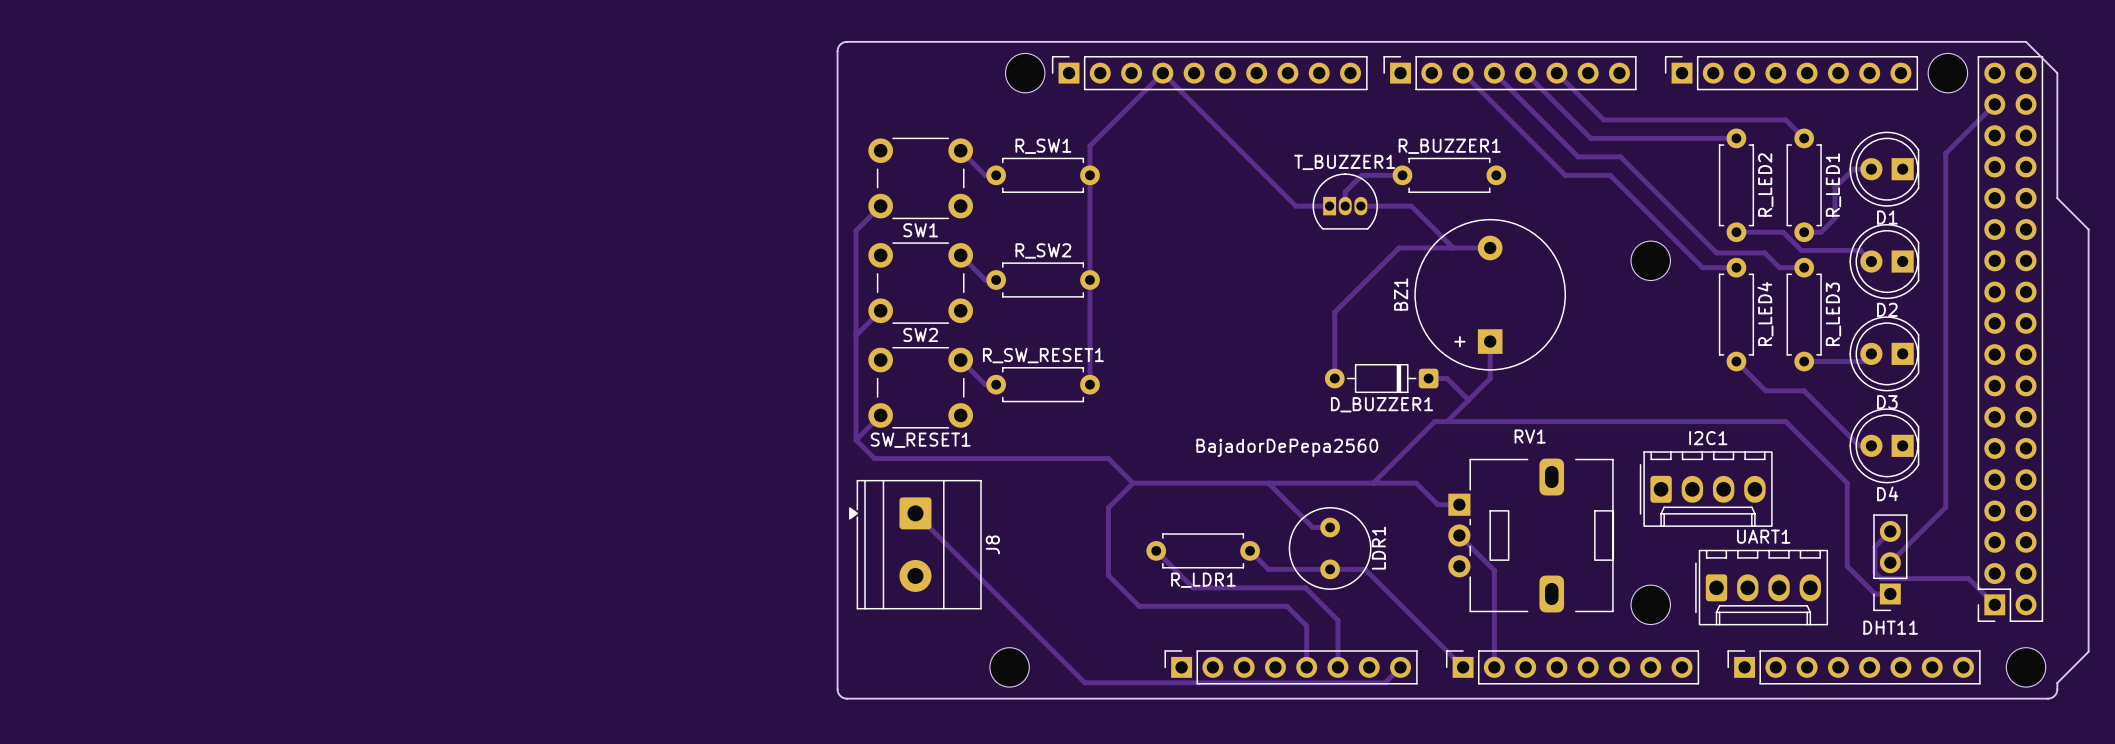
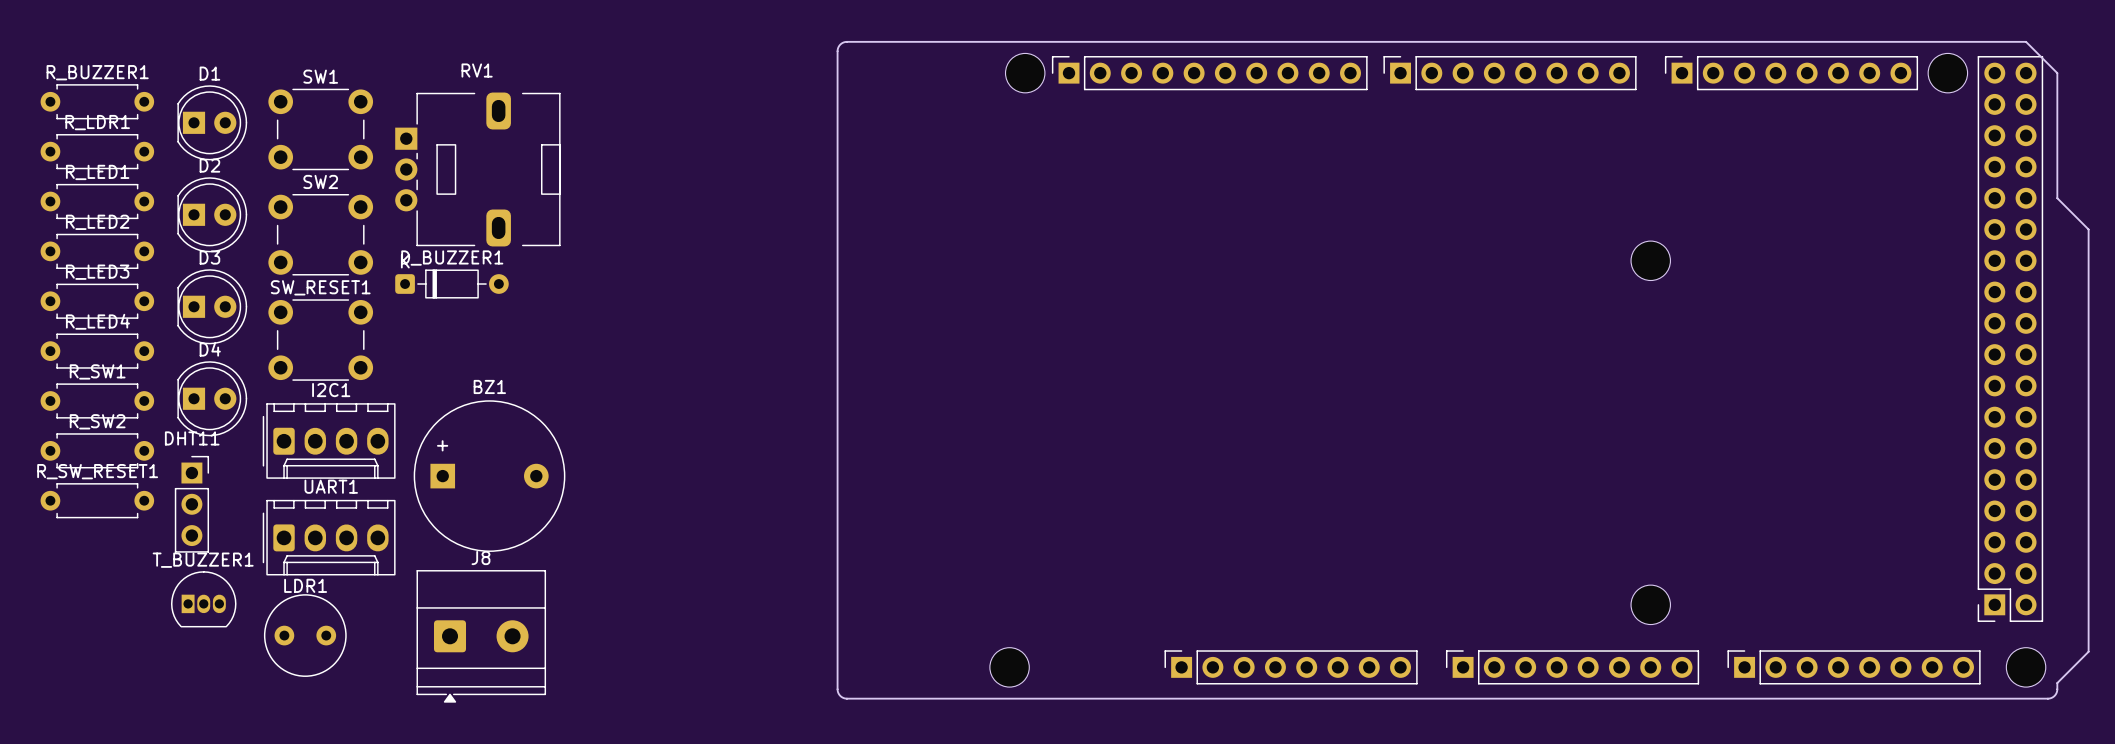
track: (1463, 73) (1565, 175) (1610, 175) (1702, 267) (1736, 267) -> none
track: (1494, 73) (1578, 156) (1620, 156) (1716, 252) (1764, 252) (1779, 267) (1804, 267) -> none
track: (1525, 73) (1590, 138) (1736, 138) -> none
track: (1556, 73) (1603, 119) (1785, 119) (1804, 138) -> none
track: (1994, 104) (1945, 153) (1945, 507) (1890, 562) -> none
track: (960, 150) (985, 175) (996, 175) -> none
track: (1871, 169) (1853, 169) (1834, 187) (1834, 218) (1821, 232) (1804, 232) -> none
D1 rotation: 0° (1884, 169) -> 180° (212, 122)
D1 position: (1884, 169) -> (212, 122)
R_SW1 position: (1043, 175) -> (97, 400)
track: (1402, 175) (1361, 175) (1345, 191) (1345, 206) -> none
R_BUZZER1 position: (1449, 175) -> (97, 101)
SW1 position: (920, 178) -> (320, 129)
R_LED2 rotation: 0° (1736, 185) -> 90° clockwise (97, 251)
R_LED2 position: (1736, 185) -> (97, 251)
R_LED2 name position: R_LED2 (1765, 185) -> R_LED2 (97, 222)
R_LED1 rotation: 0° (1804, 185) -> 90° clockwise (97, 201)
R_LED1 position: (1804, 185) -> (97, 201)
R_LED1 name position: R_LED1 (1833, 185) -> R_LED1 (97, 172)
T_BUZZER1 position: (1345, 201) -> (203, 599)
track: (880, 206) (856, 230) (856, 440) -> none
track: (1329, 206) (1295, 206) (1162, 73) (1089, 145) (1089, 384) -> none
track: (1360, 206) (1411, 206) (1453, 247) -> none
SW1 name position: SW1 (920, 230) -> SW1 (320, 76)
track: (1736, 232) (1783, 232) (1801, 250) (1860, 250) (1871, 261) -> none
track: (1490, 247) (1399, 247) (1334, 312) (1334, 378) -> none
track: (960, 255) (985, 280) (996, 280) -> none
D2 rotation: 0° (1884, 261) -> 180° (212, 214)
D2 position: (1884, 261) -> (212, 214)
R_SW2 position: (1043, 280) -> (97, 450)
SW2 position: (920, 283) -> (320, 234)
BZ1 rotation: 0° (1490, 294) -> 90° clockwise (489, 476)
BZ1 position: (1490, 294) -> (489, 476)
track: (880, 310) (856, 335) -> none
R_LED4 rotation: 0° (1736, 314) -> 90° clockwise (97, 351)
R_LED4 position: (1736, 314) -> (97, 351)
R_LED4 name position: R_LED4 (1765, 314) -> R_LED4 (97, 321)
R_LED3 rotation: 0° (1804, 314) -> 90° clockwise (97, 301)
R_LED3 position: (1804, 314) -> (97, 301)
R_LED3 name position: R_LED3 (1833, 314) -> R_LED3 (97, 272)
SW2 name position: SW2 (920, 334) -> SW2 (320, 181)
track: (1490, 341) (1490, 378) (1447, 421) -> none
track: (1871, 353) (1863, 361) (1804, 361) -> none
D3 rotation: 0° (1884, 353) -> 180° (212, 306)
D3 position: (1884, 353) -> (212, 306)
track: (960, 360) (985, 384) (996, 384) -> none
track: (1736, 361) (1765, 390) (1804, 390) (1859, 445) (1871, 445) -> none
D_BUZZER1 footprint: [1324, 363, 1439, 394] -> [395, 269, 509, 299]
track: (1428, 378) (1447, 378) (1468, 400) -> none
R_SW_RESET1 position: (1043, 384) -> (97, 500)
SW_RESET1 position: (920, 387) -> (320, 340)
D_BUZZER1 name position: D_BUZZER1 (1381, 404) -> D_BUZZER1 (452, 258)
track: (880, 415) (856, 440) -> none
track: (856, 440) (874, 458) (1108, 458) (1133, 483) -> none
SW_RESET1 name position: SW_RESET1 (920, 440) -> SW_RESET1 (320, 287)
D4 rotation: 0° (1884, 445) -> 180° (212, 398)
D4 position: (1884, 445) -> (212, 398)
text: BajadorDePepa2560 (1287, 447) -> none
track: (1133, 483) (1416, 483) (1437, 504) (1459, 504) -> none
track: (1133, 483) (1108, 507) (1108, 575) (1139, 606) (1287, 606) (1306, 626) (1306, 667) -> none
track: (1268, 483) (1312, 527) (1330, 527) -> none
track: (1373, 483) (1434, 421) (1785, 421) (1847, 483) (1847, 566) (1874, 593) (1890, 593) -> none
I2C1 position: (1706, 489) -> (329, 441)
track: (915, 513) (1084, 682) (1385, 682) (1400, 667) -> none
track: (1890, 531) (1874, 546) (1874, 572) (1881, 578) (1968, 578) (1994, 604) -> none
track: (1459, 535) (1494, 570) (1494, 667) (1496, 665) -> none
RV1 position: (1531, 535) -> (478, 169)
J8 rotation: 0° (915, 544) -> 90° counterclockwise (481, 636)
J8 position: (915, 544) -> (481, 636)
LDR1 rotation: 0° (1330, 548) -> 90° clockwise (305, 635)
LDR1 position: (1330, 548) -> (305, 635)
LDR1 name position: LDR1 (1378, 548) -> LDR1 (305, 585)
track: (1156, 550) (1193, 587) (1305, 587) (1337, 620) (1337, 667) -> none
R_LDR1 position: (1203, 550) -> (97, 151)
track: (1250, 550) (1268, 569) (1365, 569) (1463, 667) -> none
DHT11 rotation: 0° (1890, 562) -> 180° (191, 504)
DHT11 position: (1890, 562) -> (191, 504)
R_LDR1 name position: R_LDR1 (1203, 580) -> R_LDR1 (97, 122)
UART1 position: (1761, 587) -> (329, 537)

